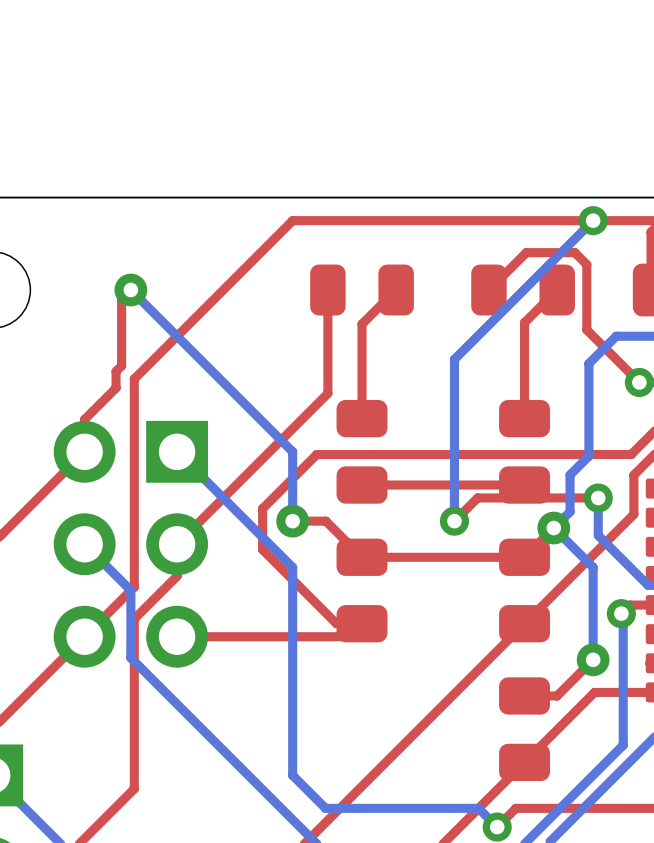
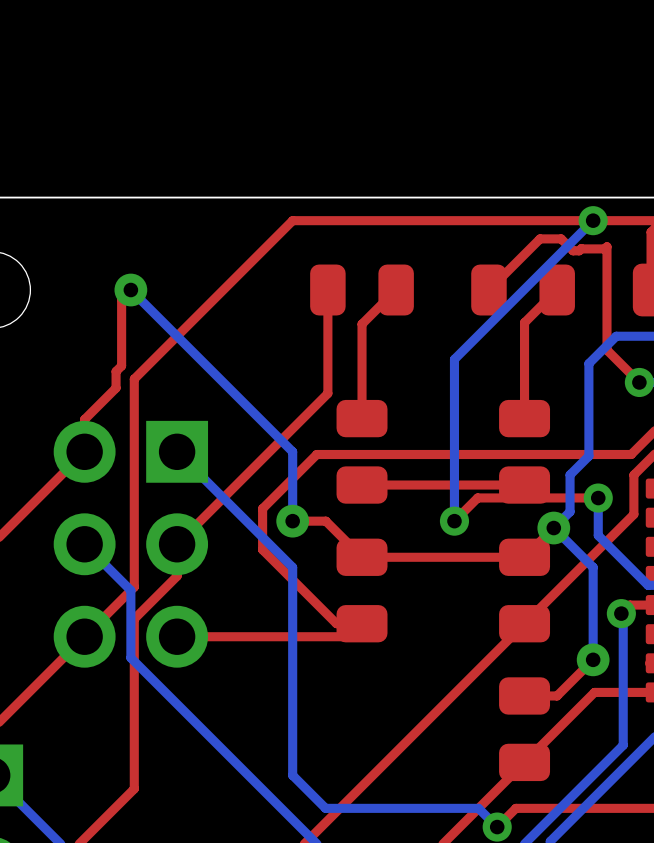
top track: none -> (581, 248) (579, 250) (573, 250) (561, 238) (540, 238) (526, 252)
top track: (526, 252) (574, 252) (586, 264) (586, 329) (606, 350) -> (581, 248) (604, 248) (606, 246) (606, 350)

